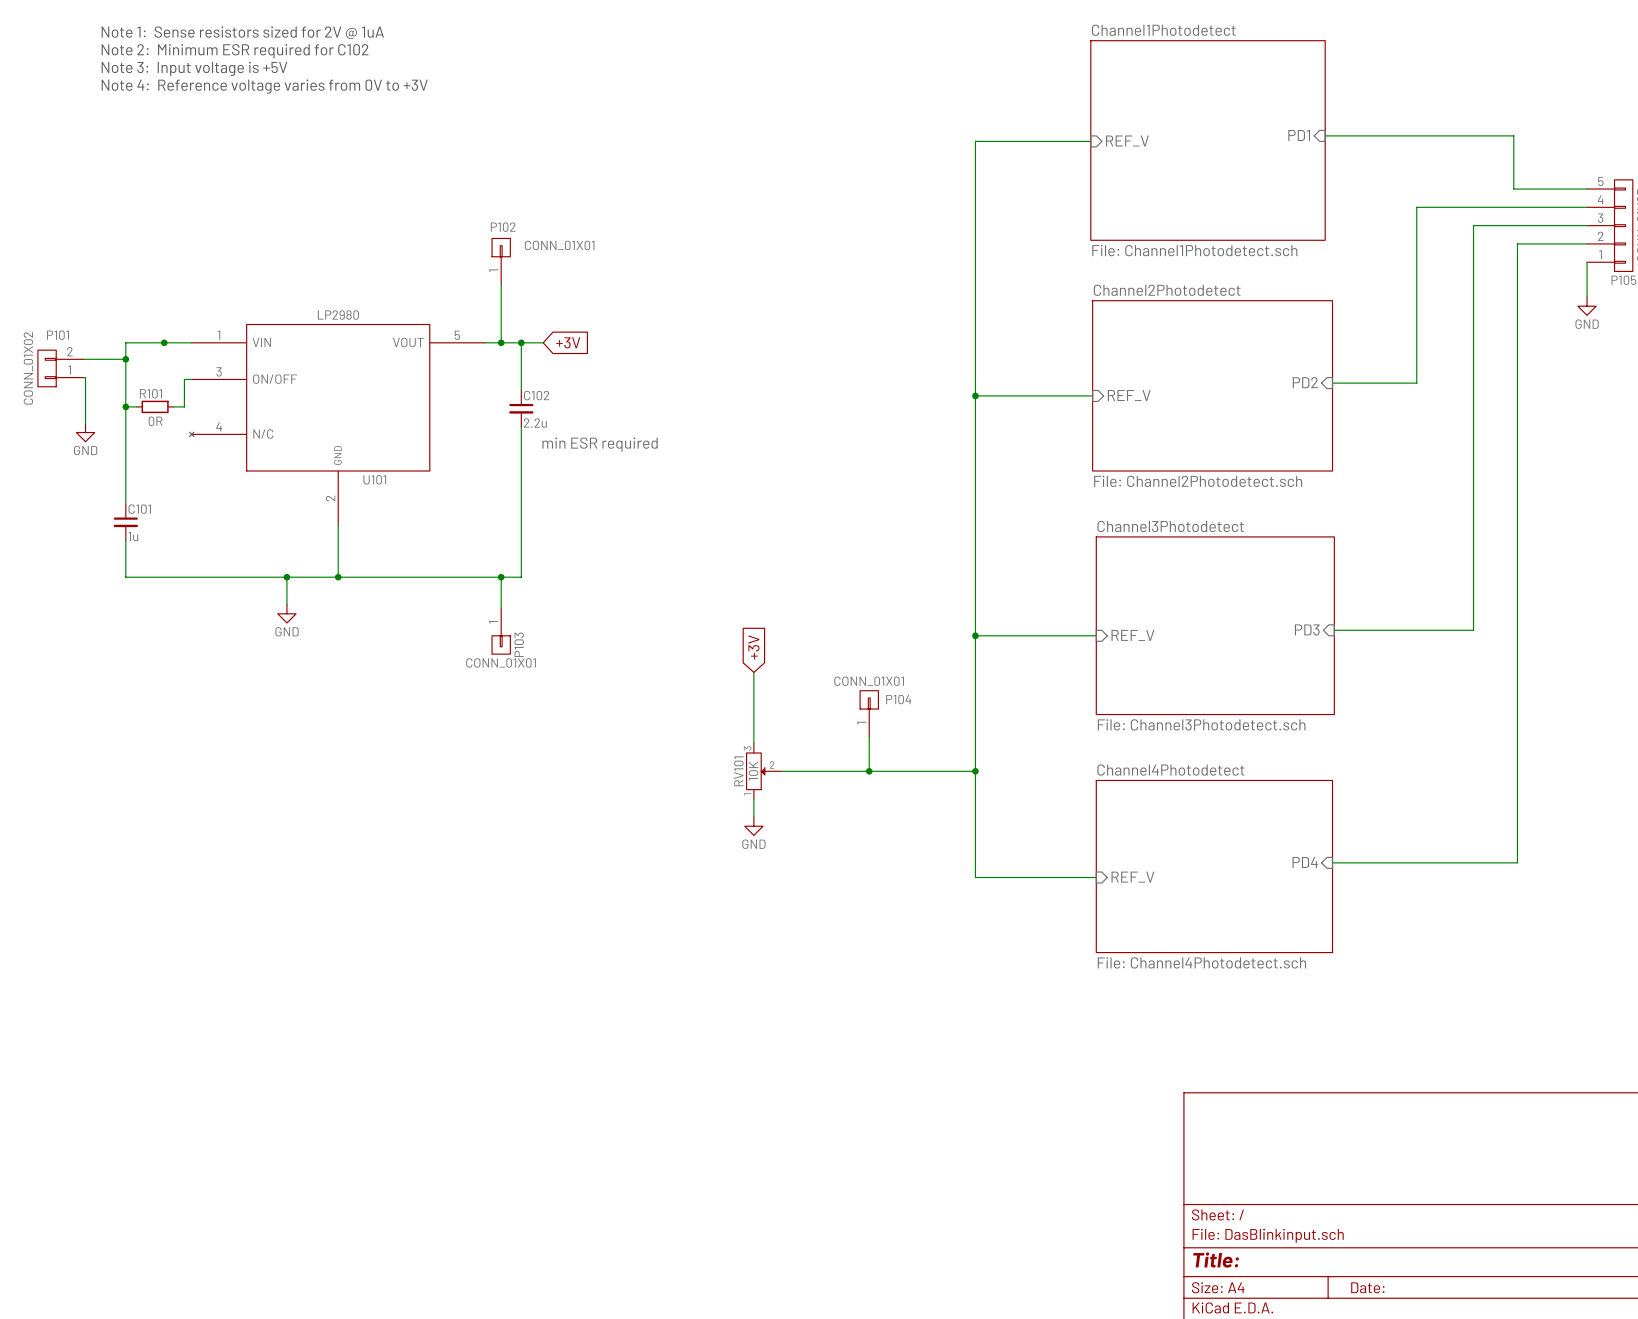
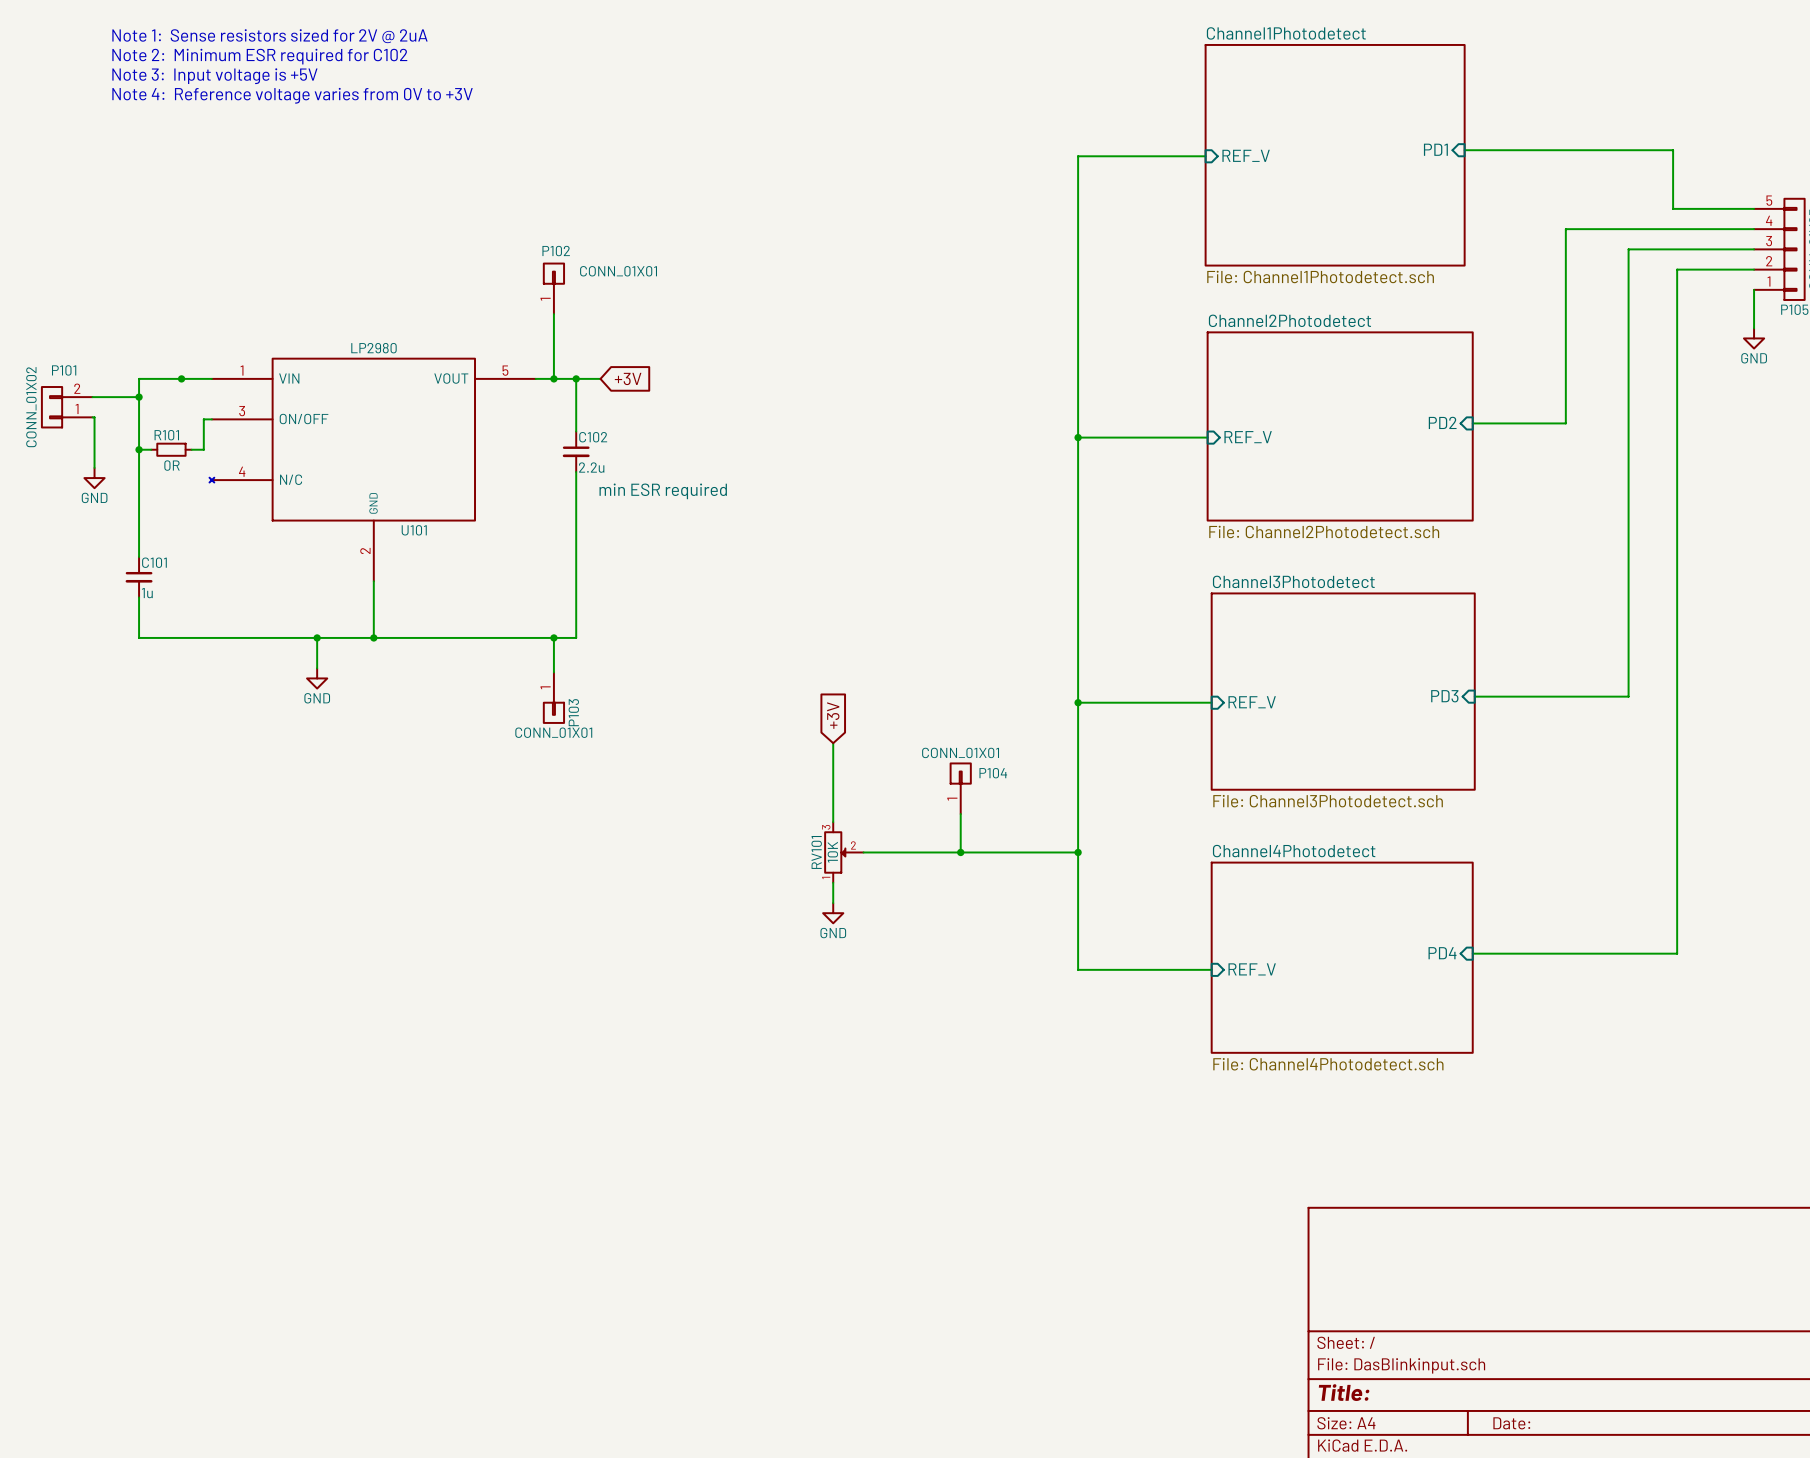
text: Note 1: Sense resistors sized for 2V @ 1uA (242, 32) -> Note 1: Sense resistors sized for 2V @ 2uA (269, 36)

